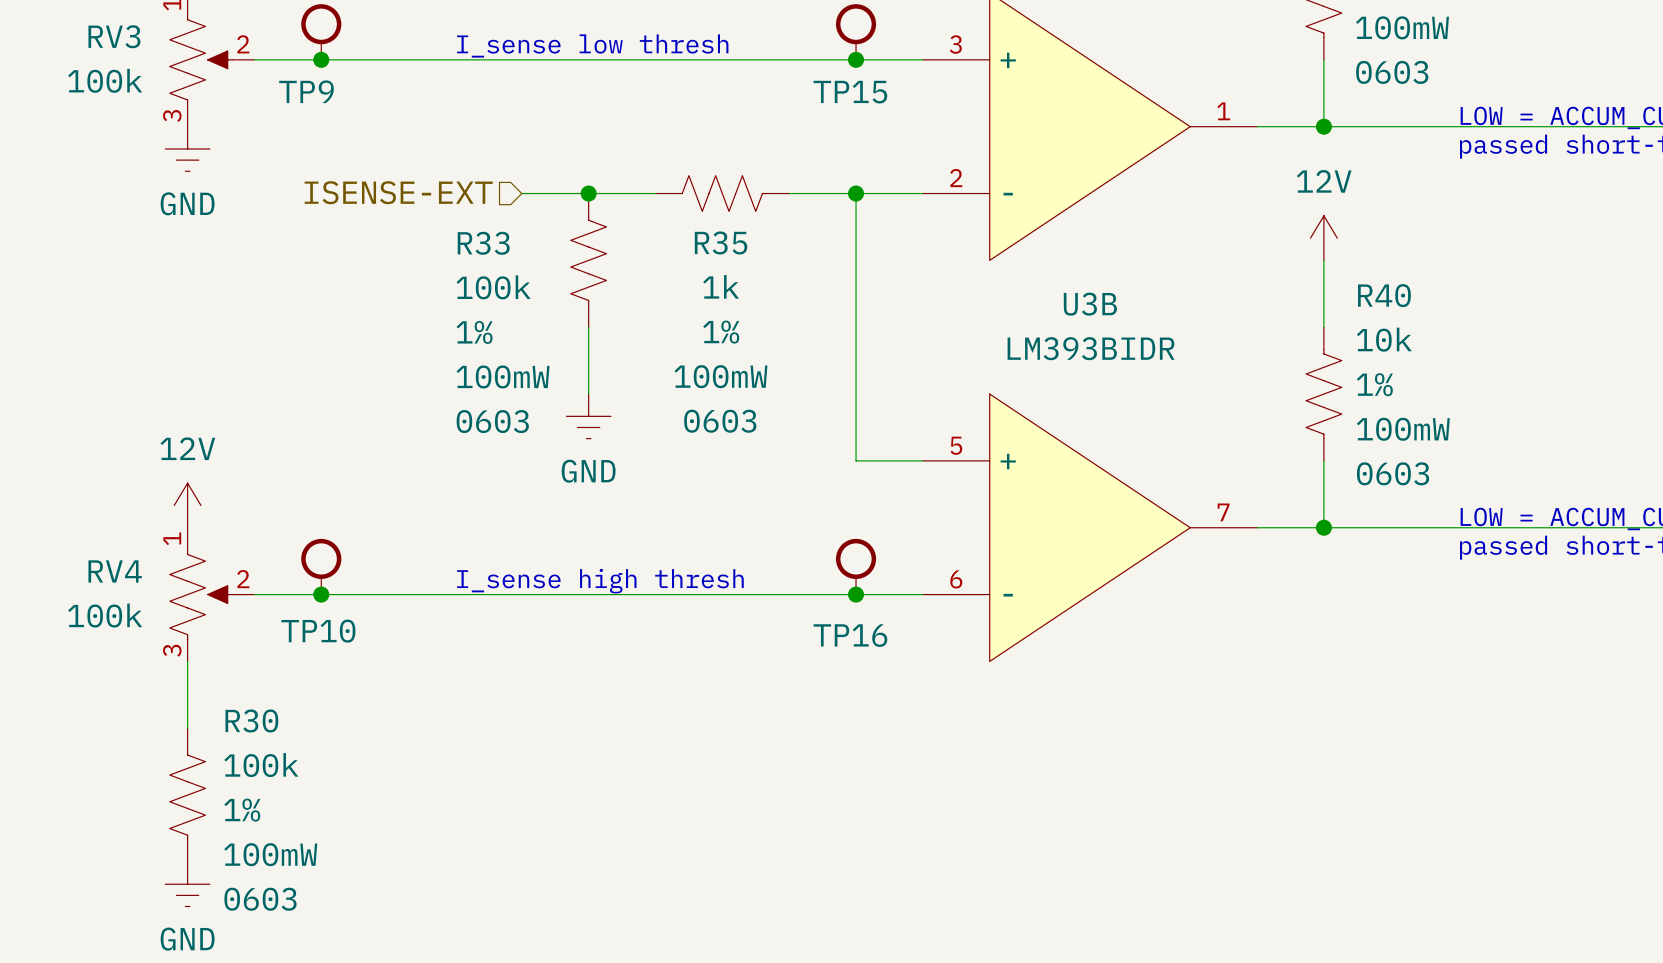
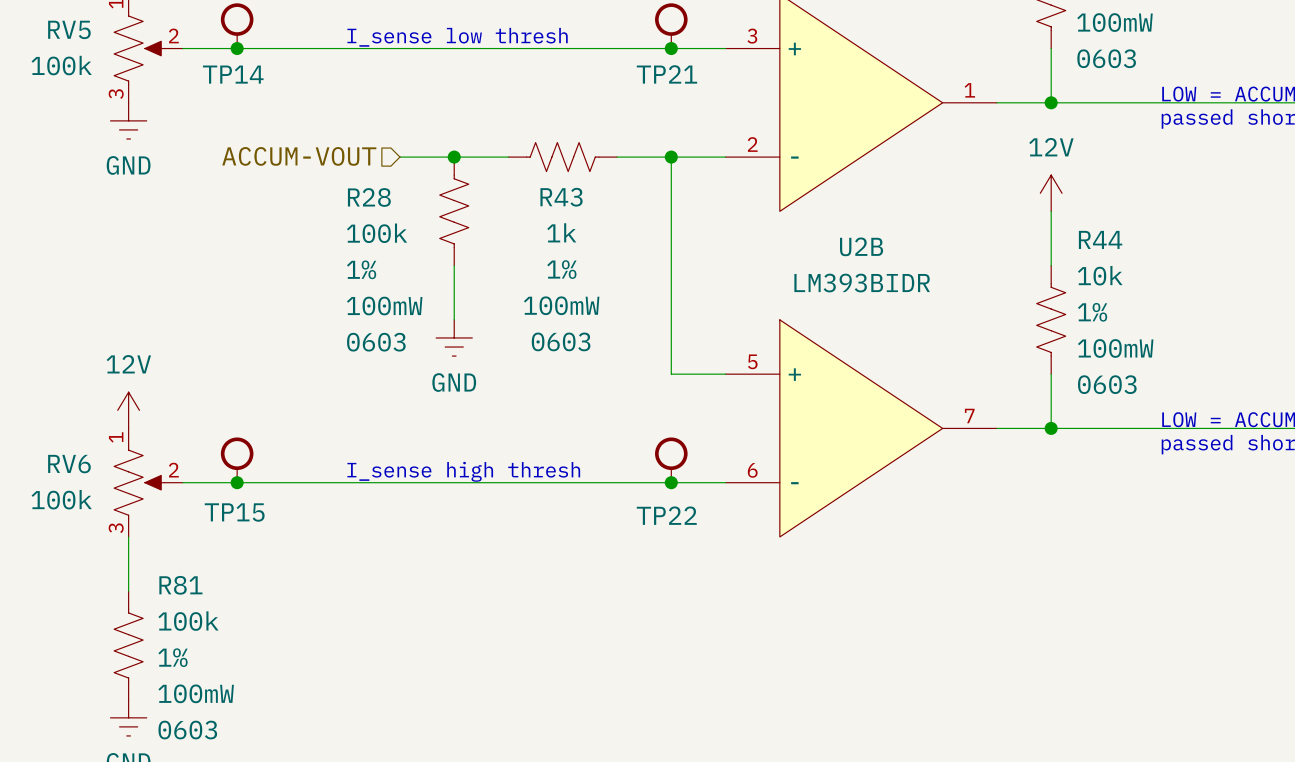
RV3 name: RV3 (114, 36) -> RV5 (69, 29)
TP9 name: TP9 (306, 91) -> TP14 (233, 74)
TP15 name: TP15 (850, 92) -> TP21 (666, 74)
hierarchical label: ISENSE-EXT (398, 192) -> ACCUM-VOUT (299, 156)
R35 name: R35 (721, 242) -> R43 (561, 197)
R33 name: R33 (483, 243) -> R28 (369, 197)
R40 name: R40 (1384, 295) -> R44 (1100, 239)
U3B name: U3B (1090, 304) -> U2B (861, 246)
RV4 name: RV4 (115, 571) -> RV6 (69, 464)
TP10 name: TP10 (318, 631) -> TP15 (234, 512)
TP16 name: TP16 (850, 635) -> TP22 (666, 515)
R30 name: R30 (251, 720) -> R81 (180, 585)

